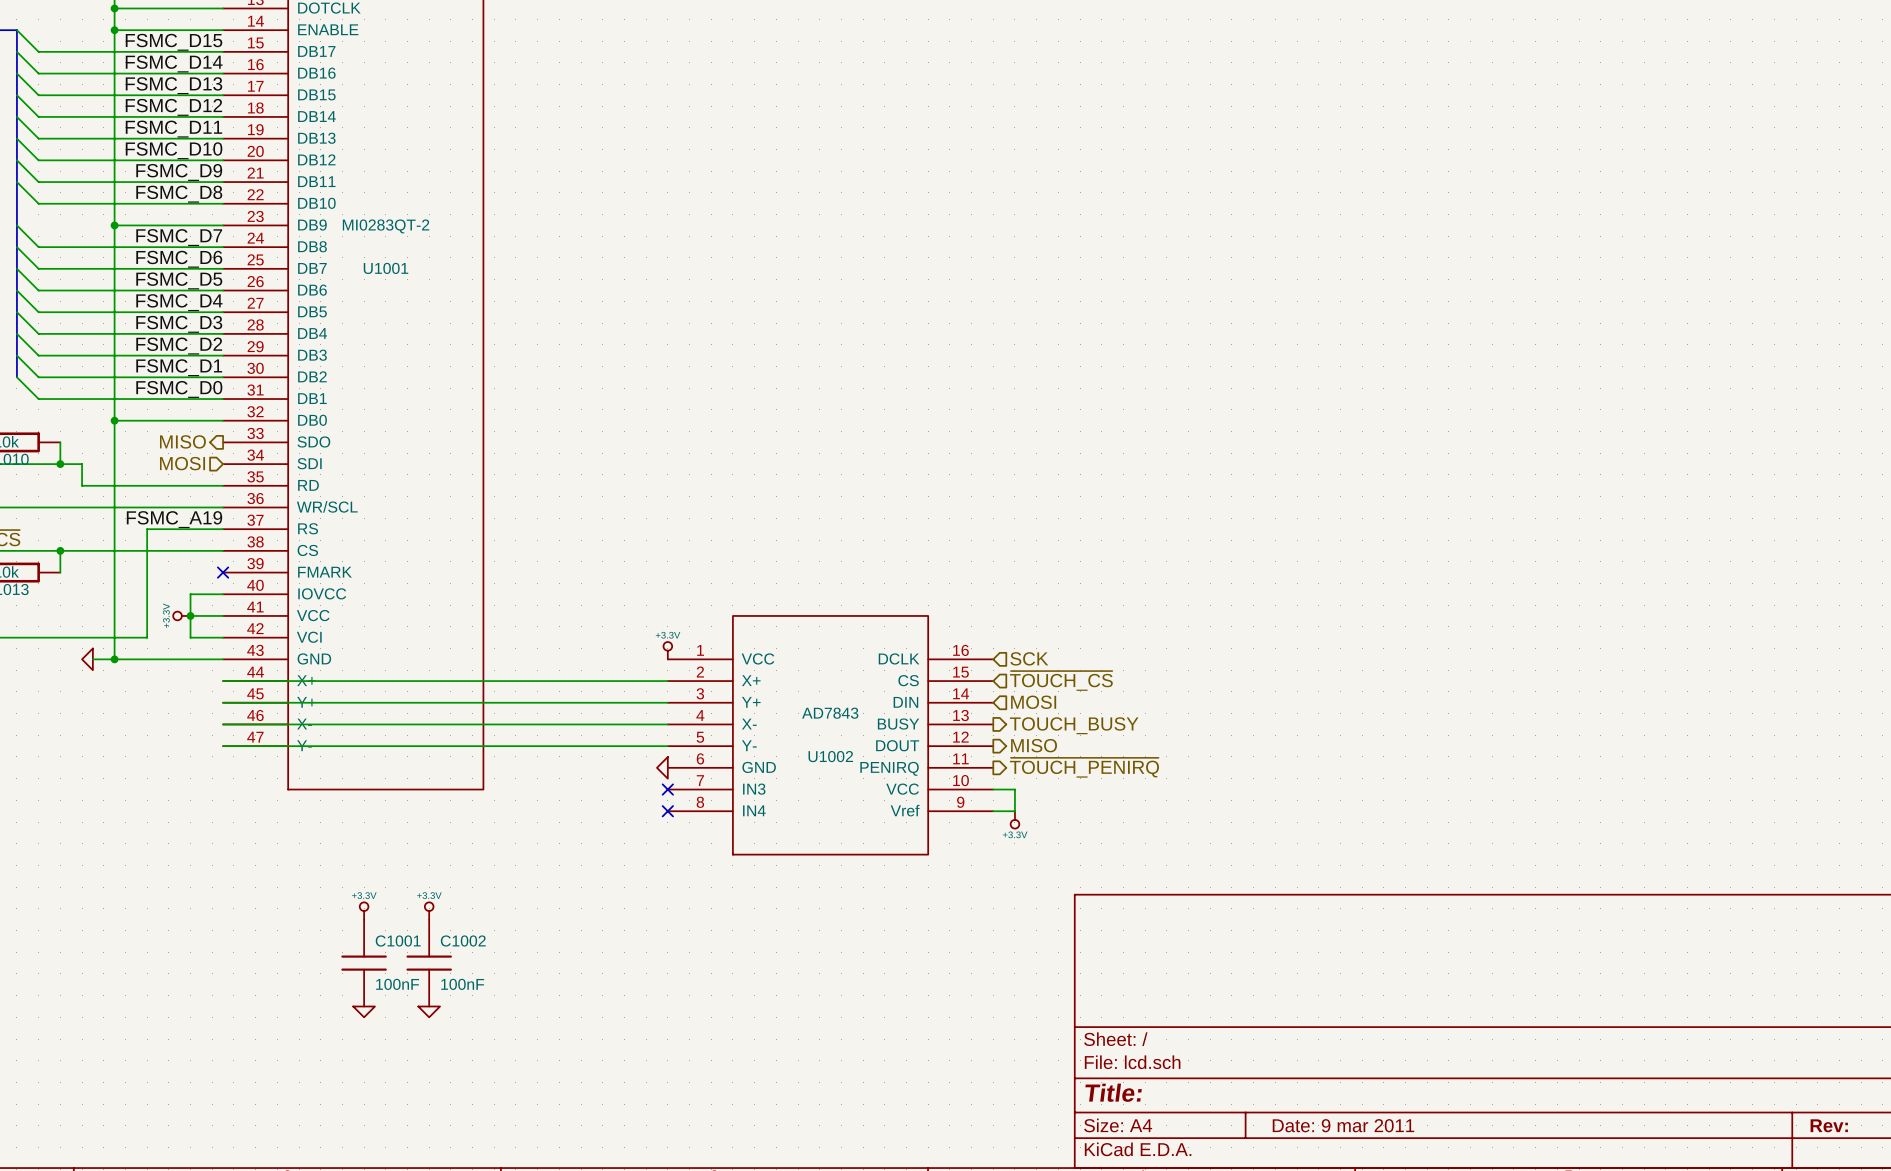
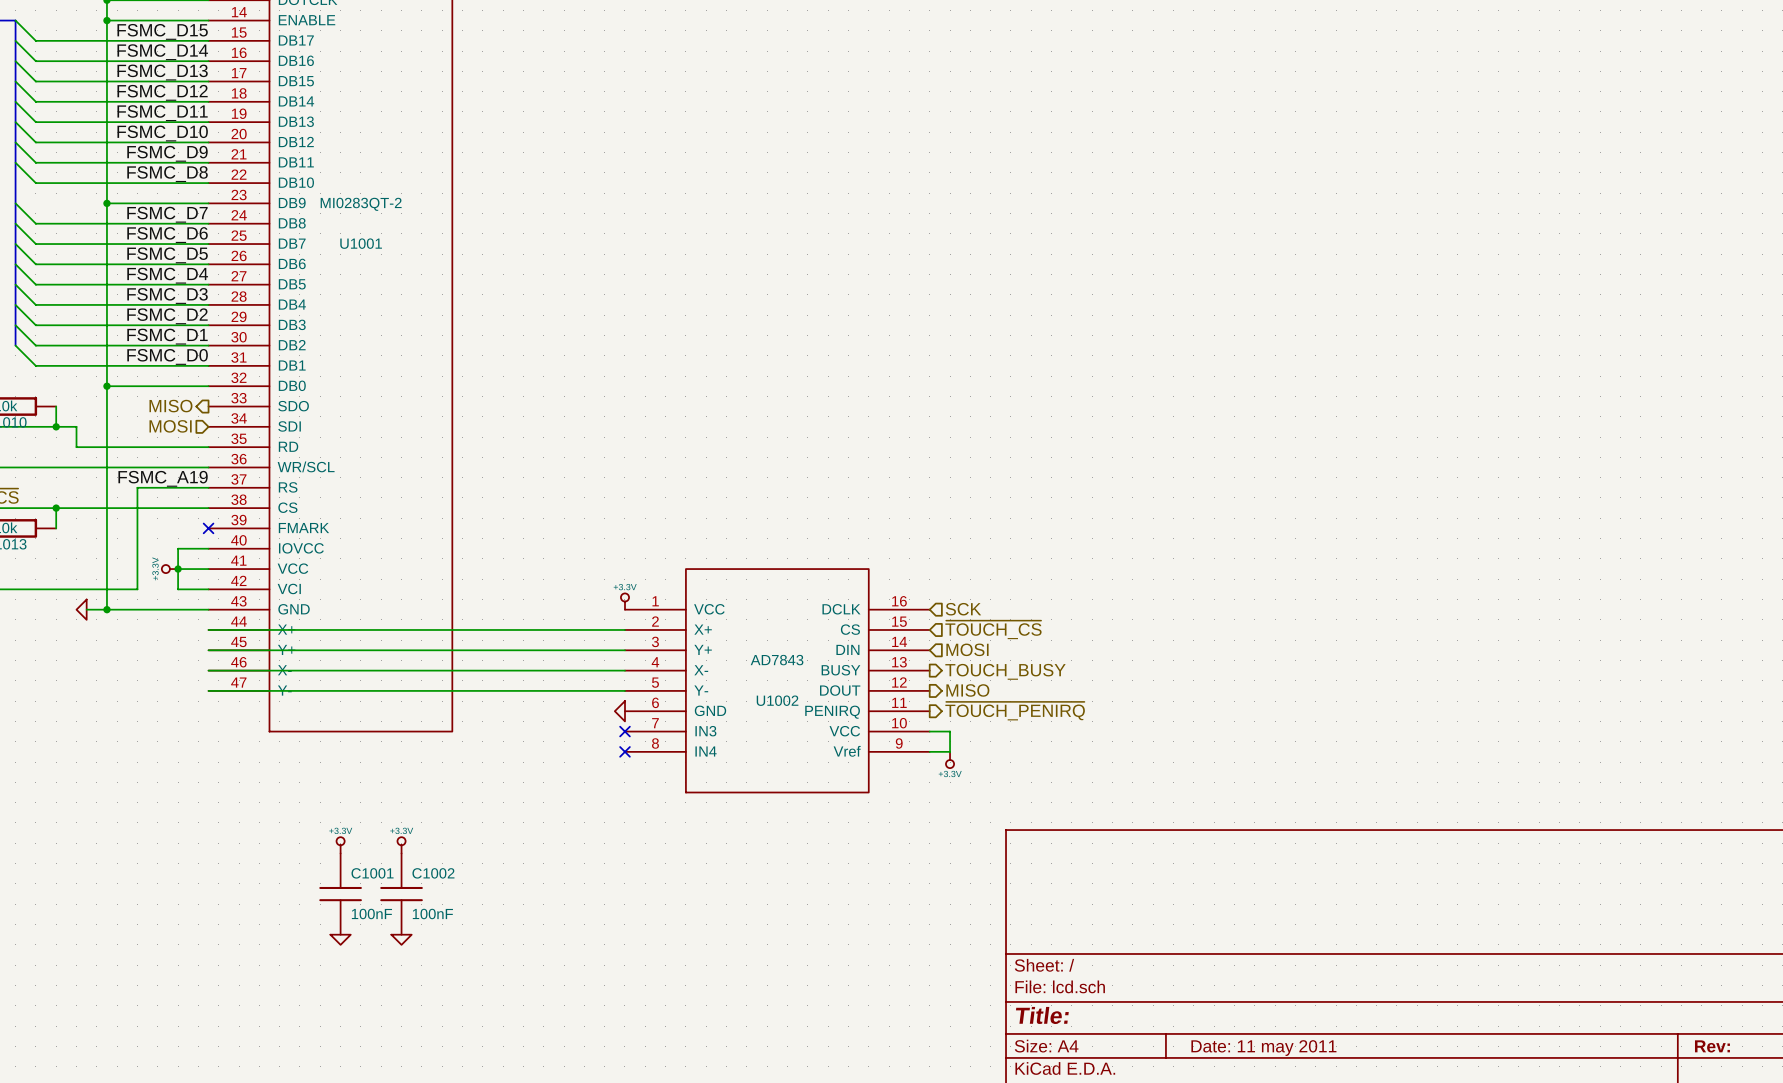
title block: Date: 9 mar 2011 (1343, 1125) -> Date: 11 may 2011 (1263, 1048)

